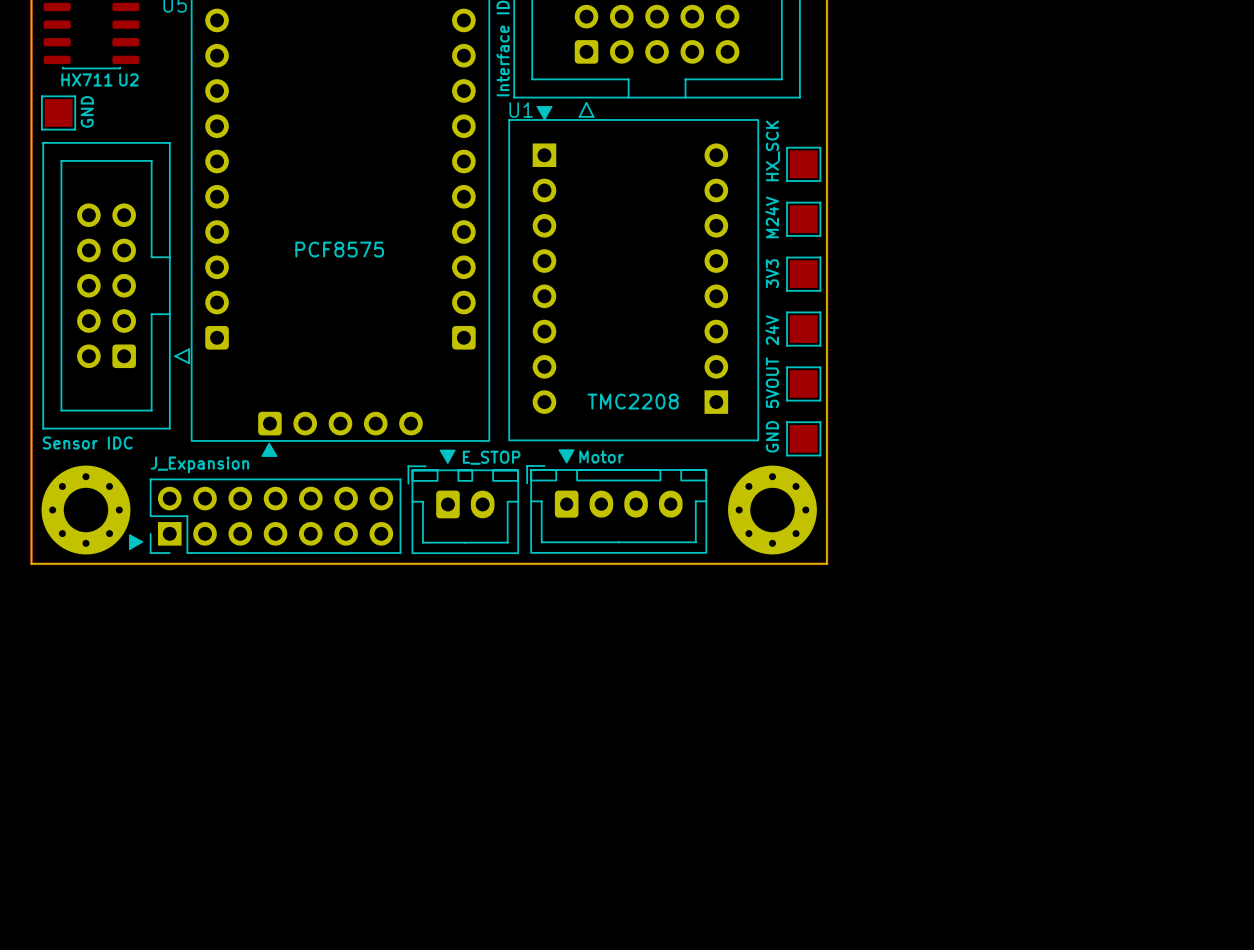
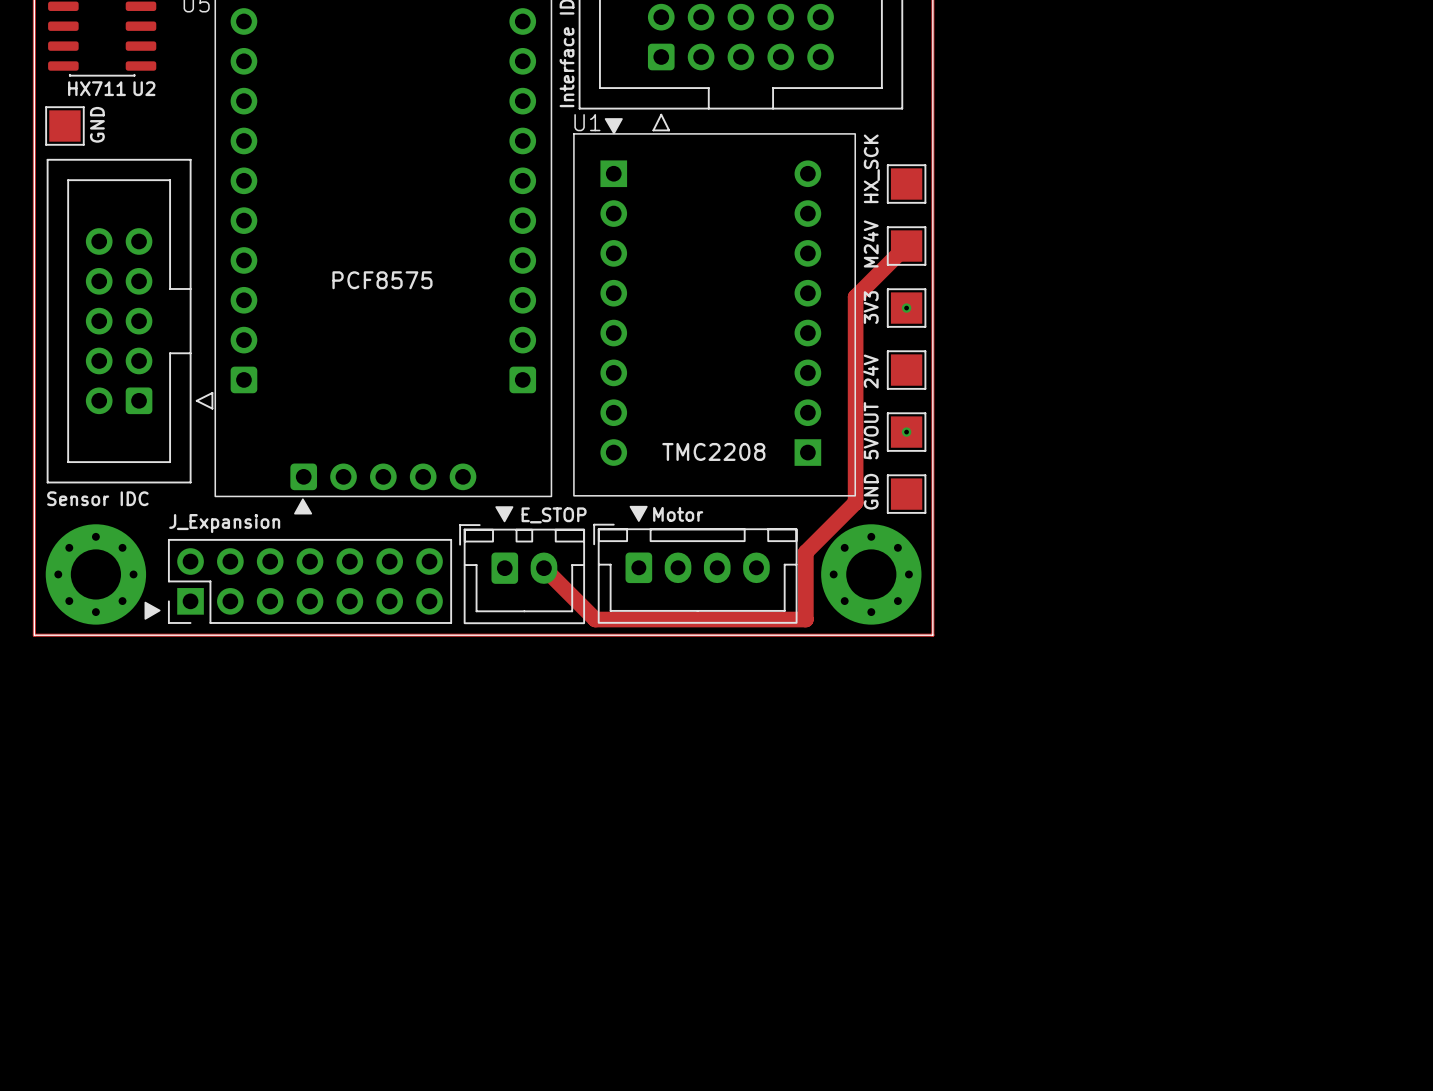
track: none -> (906, 246) (855, 296) (855, 502) (805, 552) (805, 619) (595, 619) (543, 568)
via: none -> (906, 308)
via: none -> (906, 432)

